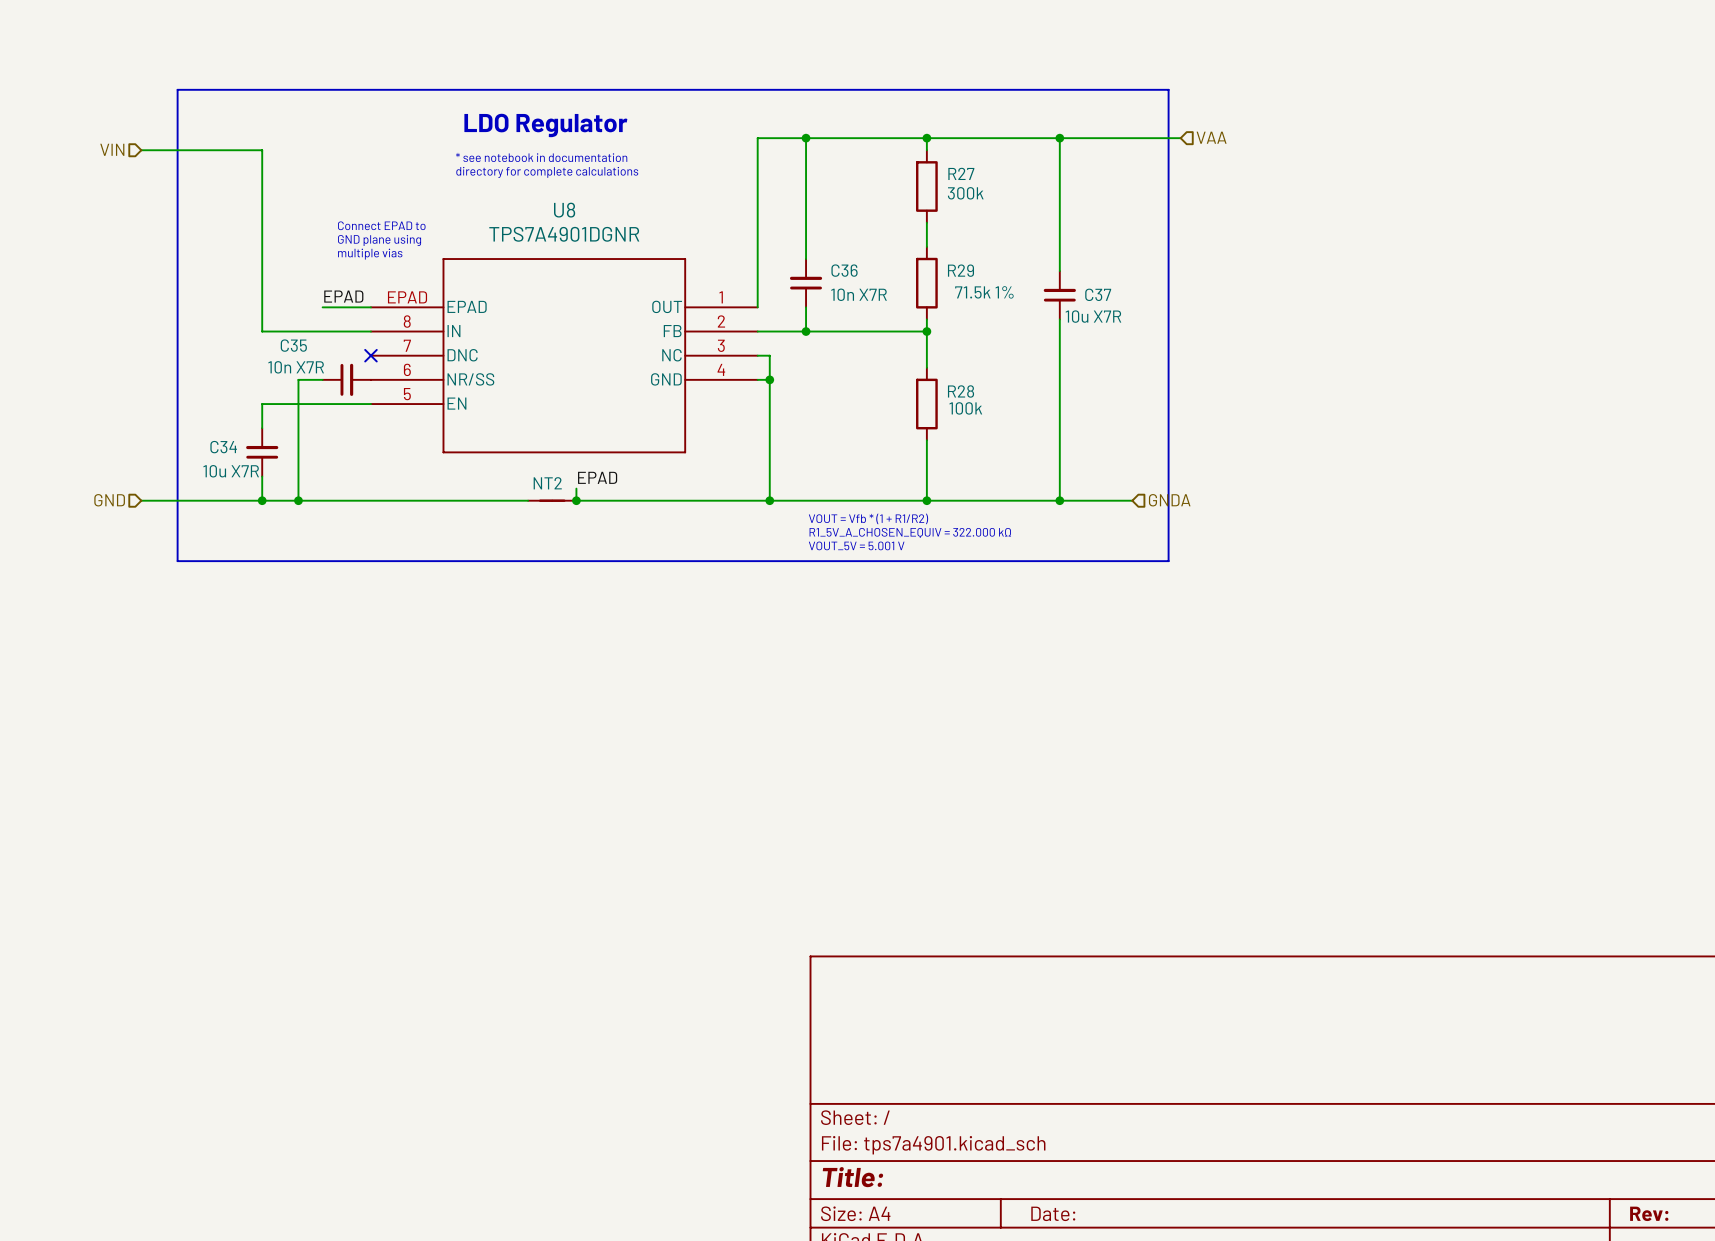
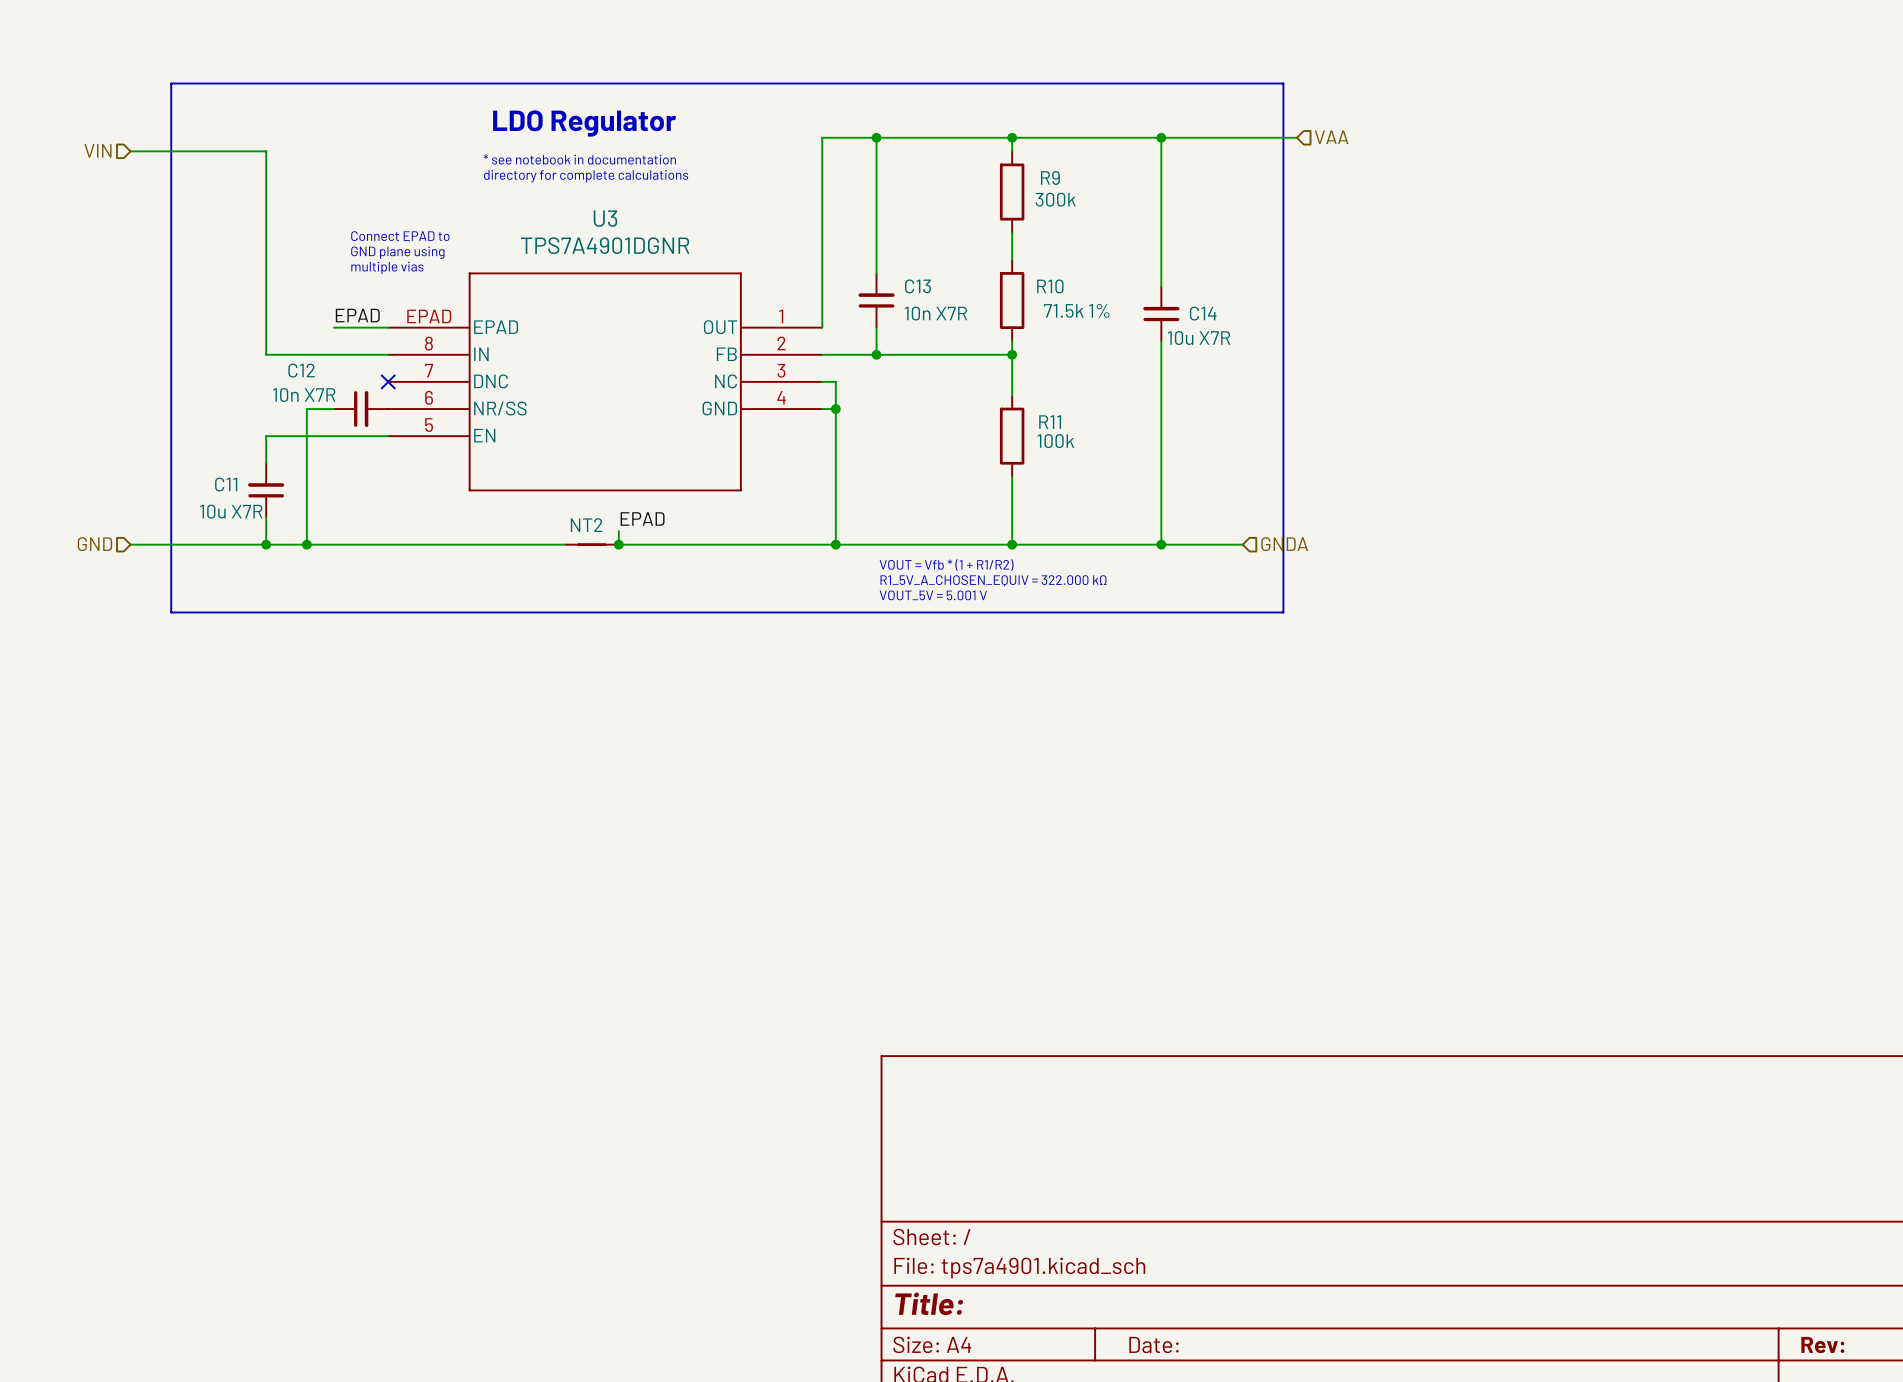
R27 name: R27 (961, 173) -> R9 (1050, 177)
U8 name: U8 (564, 210) -> U3 (605, 218)
C36 name: C36 (844, 270) -> C13 (917, 286)
R29 name: R29 (960, 270) -> R10 (1050, 286)
C37 name: C37 (1098, 294) -> C14 (1203, 313)
C35 name: C35 (293, 345) -> C12 (301, 370)
R28 name: R28 (961, 391) -> R11 (1050, 422)
C34 name: C34 (223, 447) -> C11 (226, 484)

